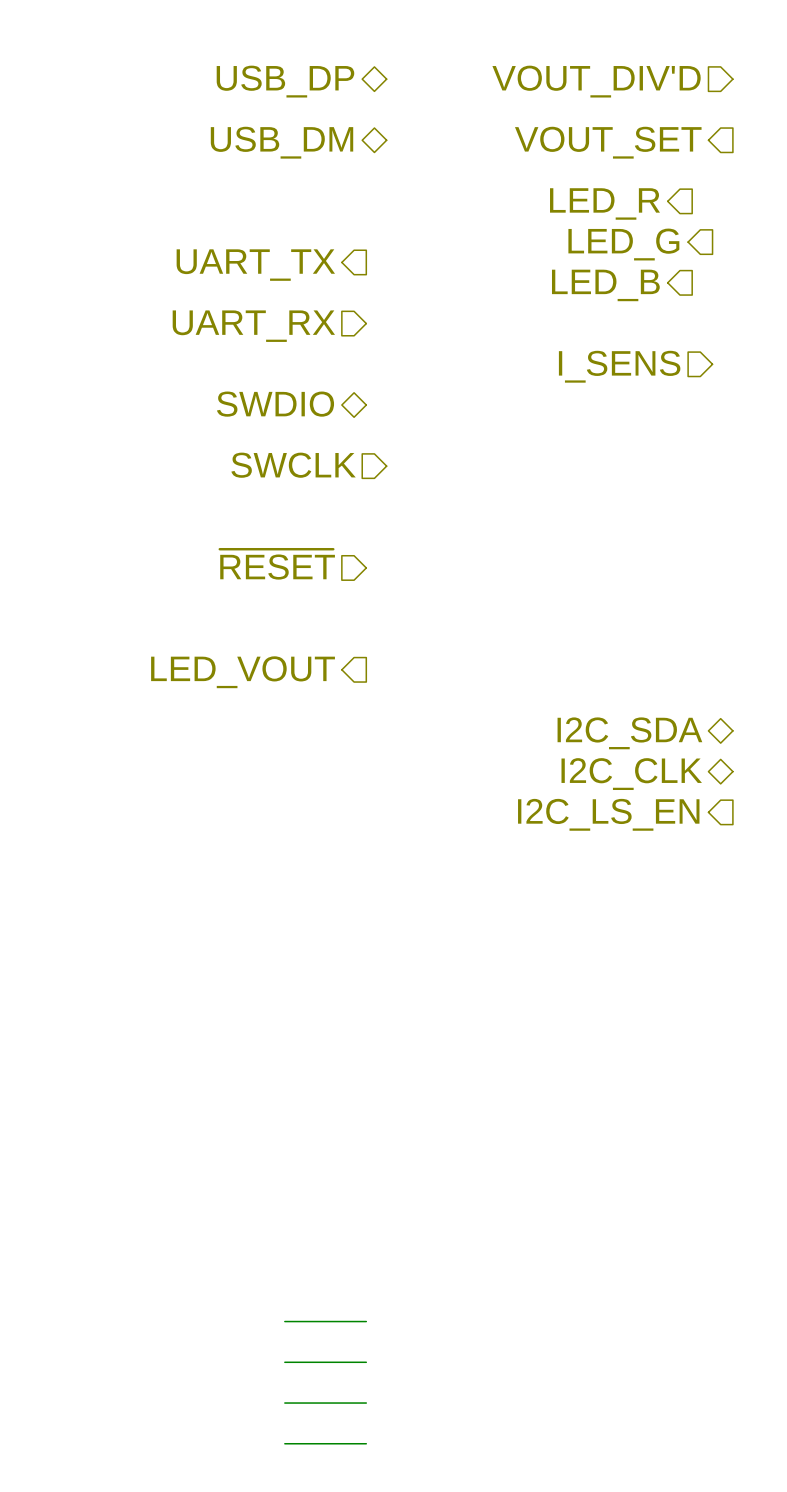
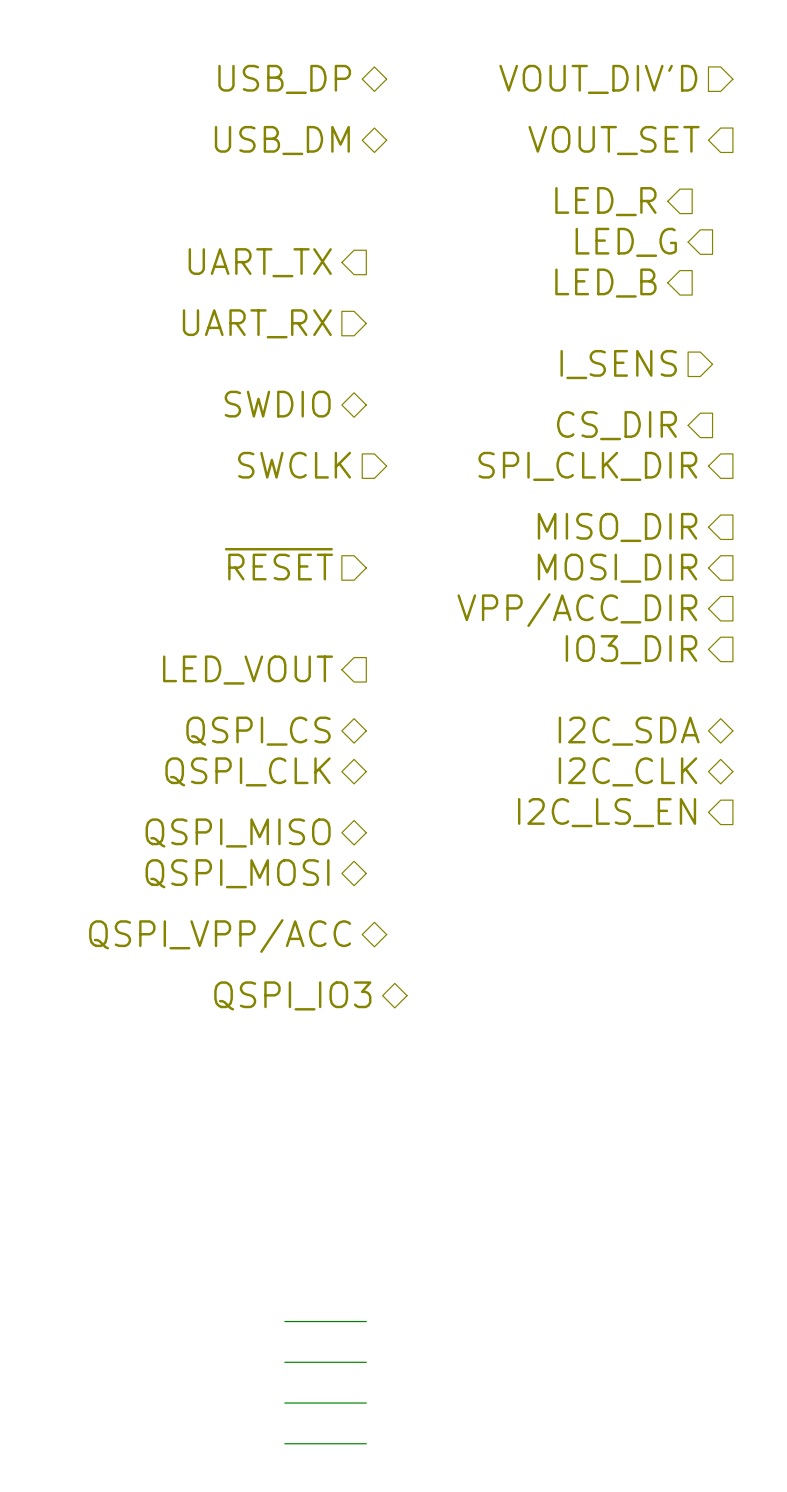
hierarchical label: none -> CS_DIR (616, 425)
hierarchical label: none -> SPI_CLK_DIR (587, 466)
hierarchical label: none -> MISO_DIR (617, 527)
hierarchical label: none -> MOSI_DIR (617, 568)
hierarchical label: none -> VPP/ACC_DIR (577, 610)
hierarchical label: none -> IO3_DIR (631, 649)
hierarchical label: none -> QSPI_CS (258, 731)
hierarchical label: none -> QSPI_CLK (248, 771)
hierarchical label: none -> QSPI_MISO (238, 832)
hierarchical label: none -> QSPI_MOSI (237, 873)
hierarchical label: none -> QSPI_VPP/ACC (220, 935)
hierarchical label: none -> QSPI_IO3 (292, 995)

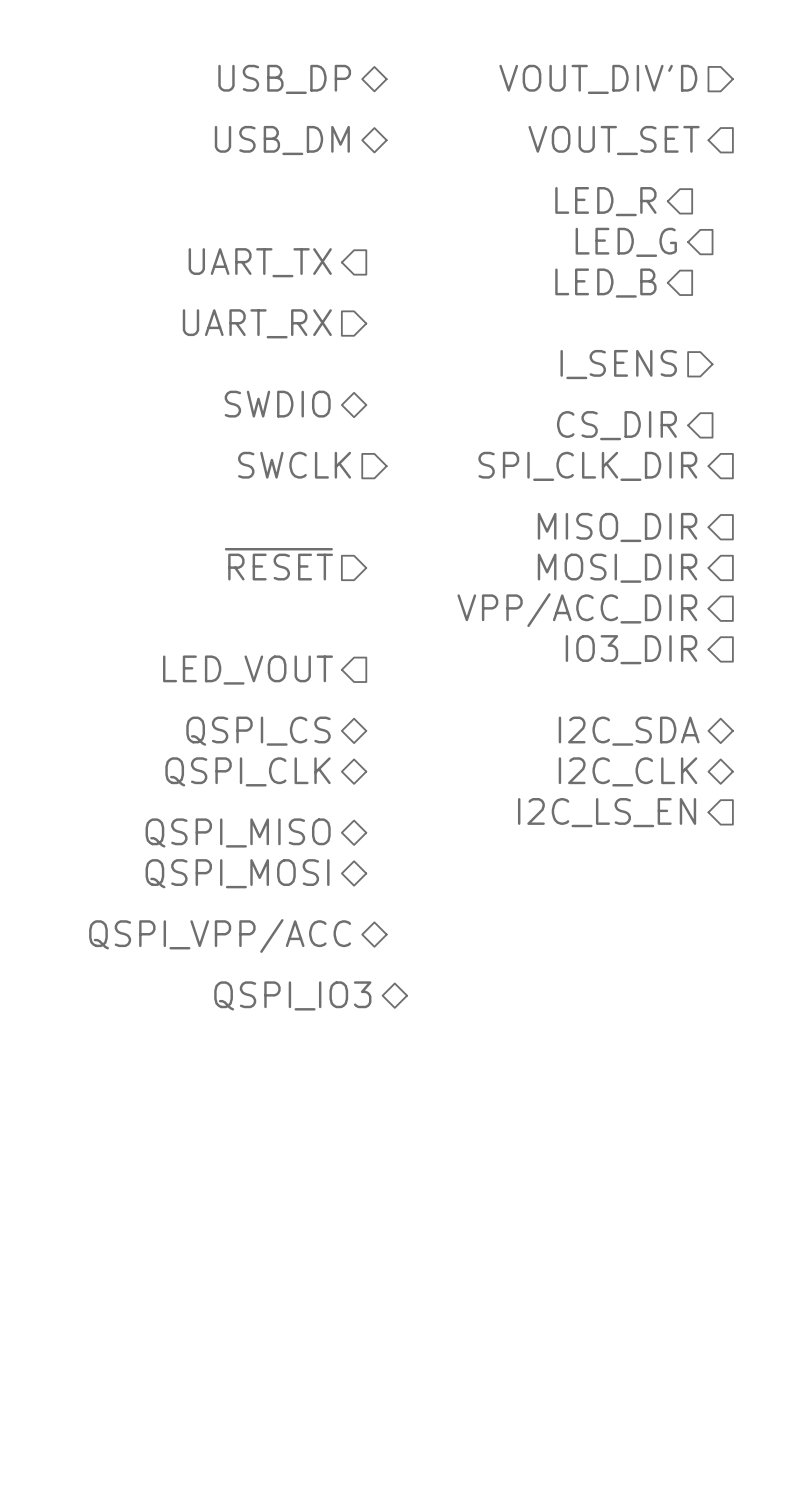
wire: (284, 1321) (366, 1321) -> none
wire: (284, 1362) (366, 1362) -> none
wire: (284, 1403) (366, 1403) -> none
wire: (284, 1443) (366, 1443) -> none

